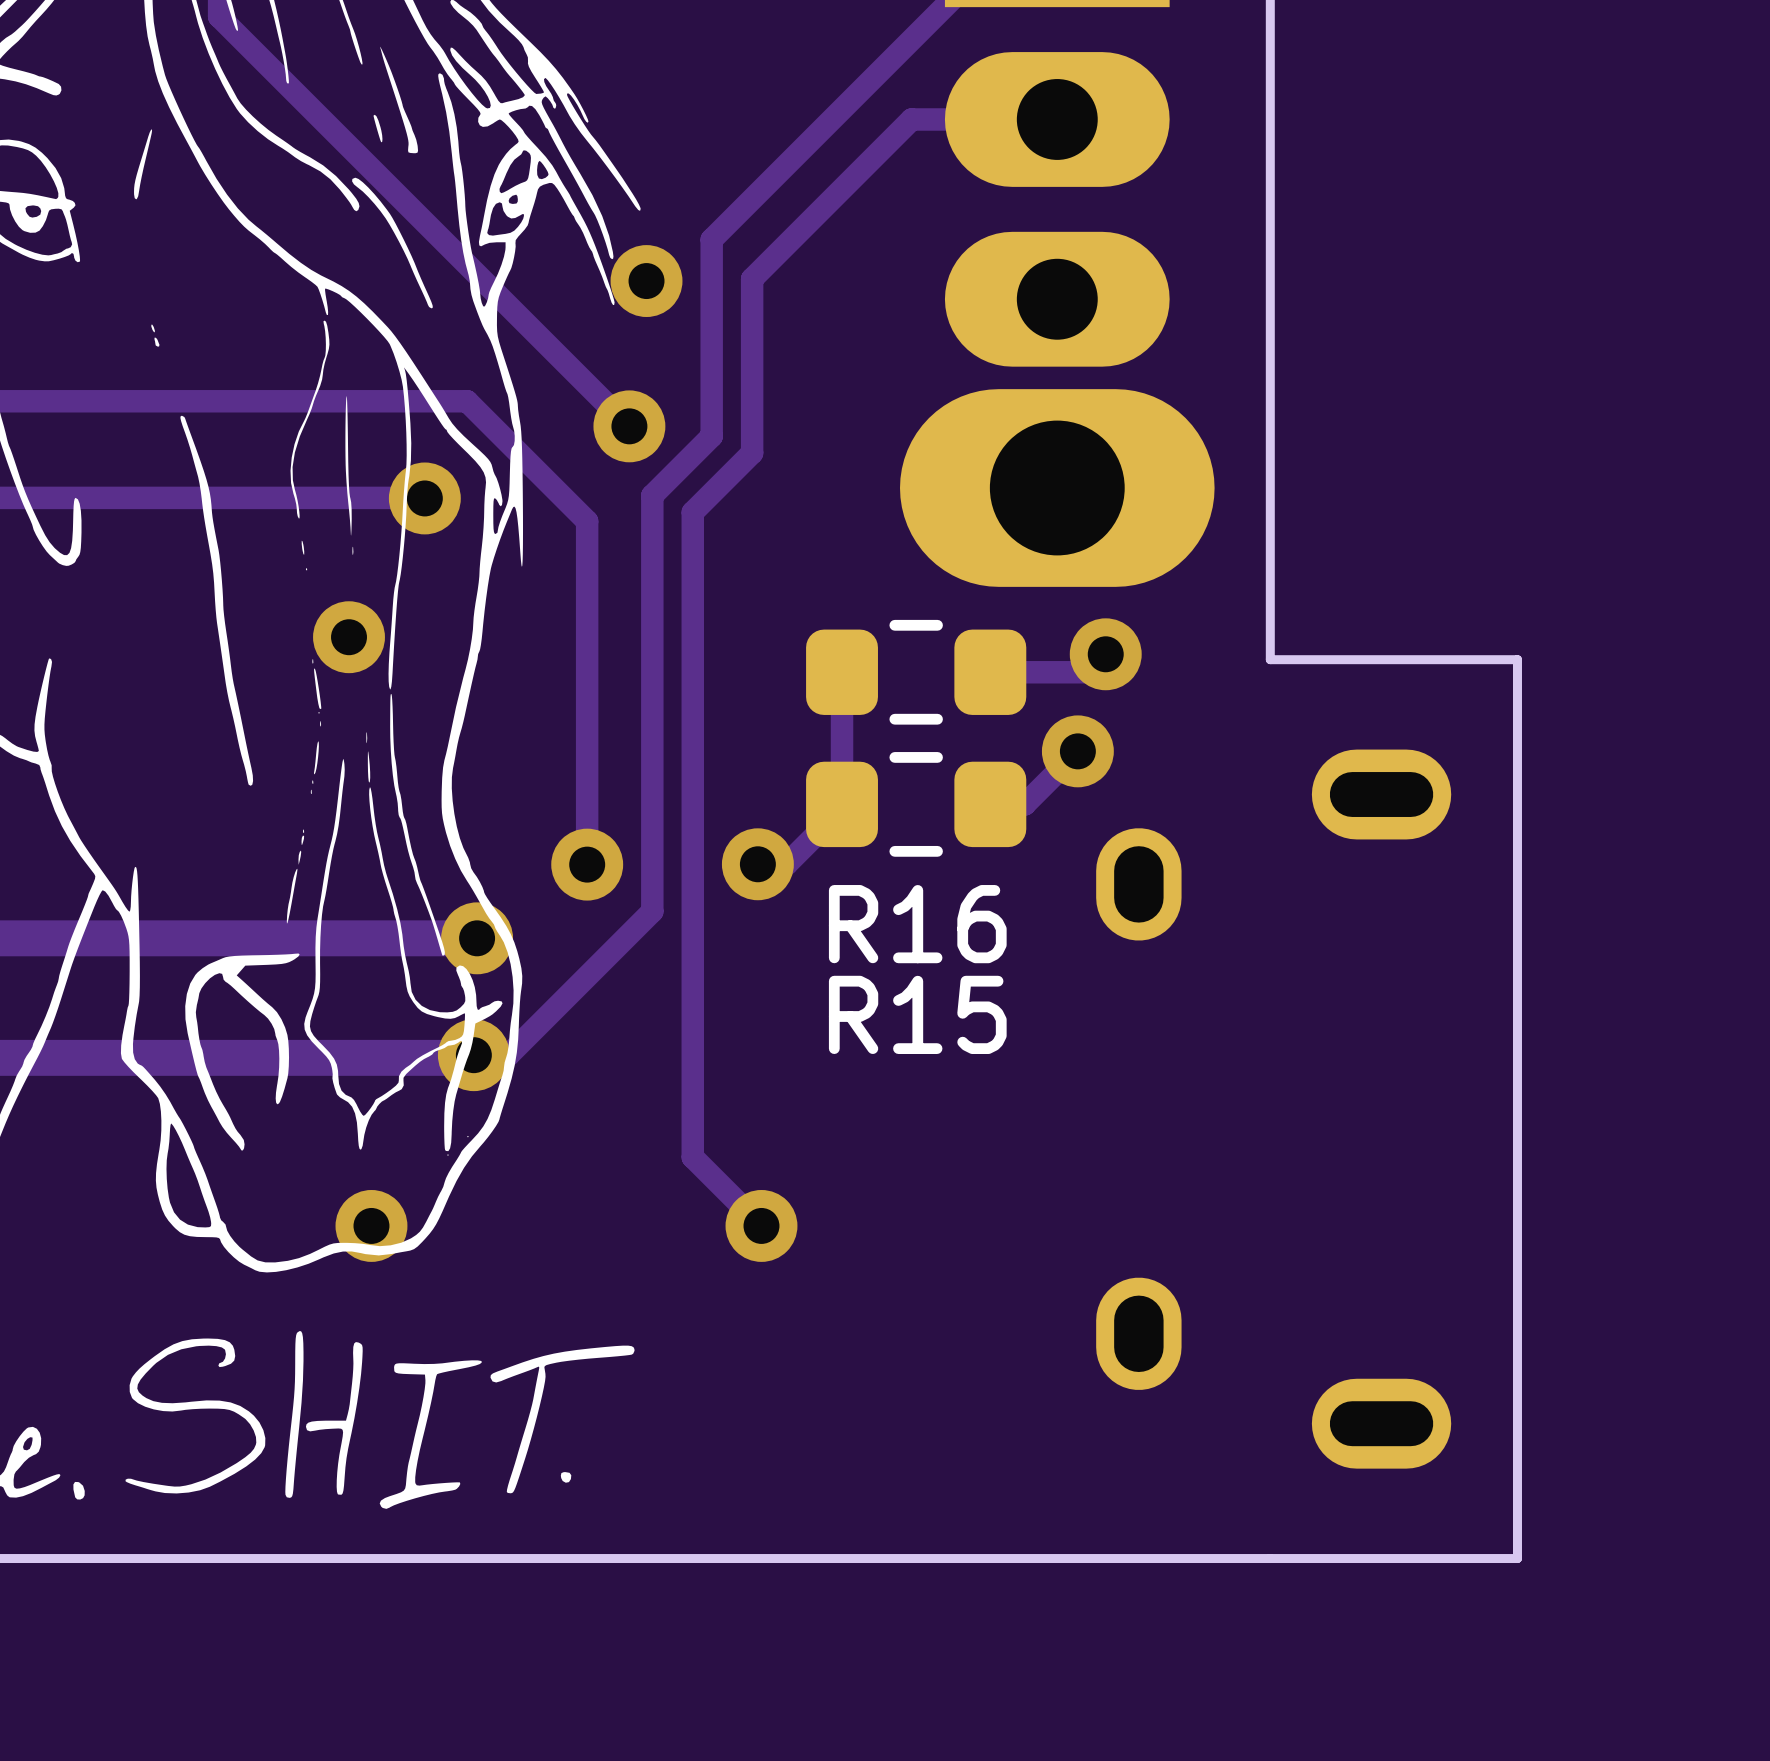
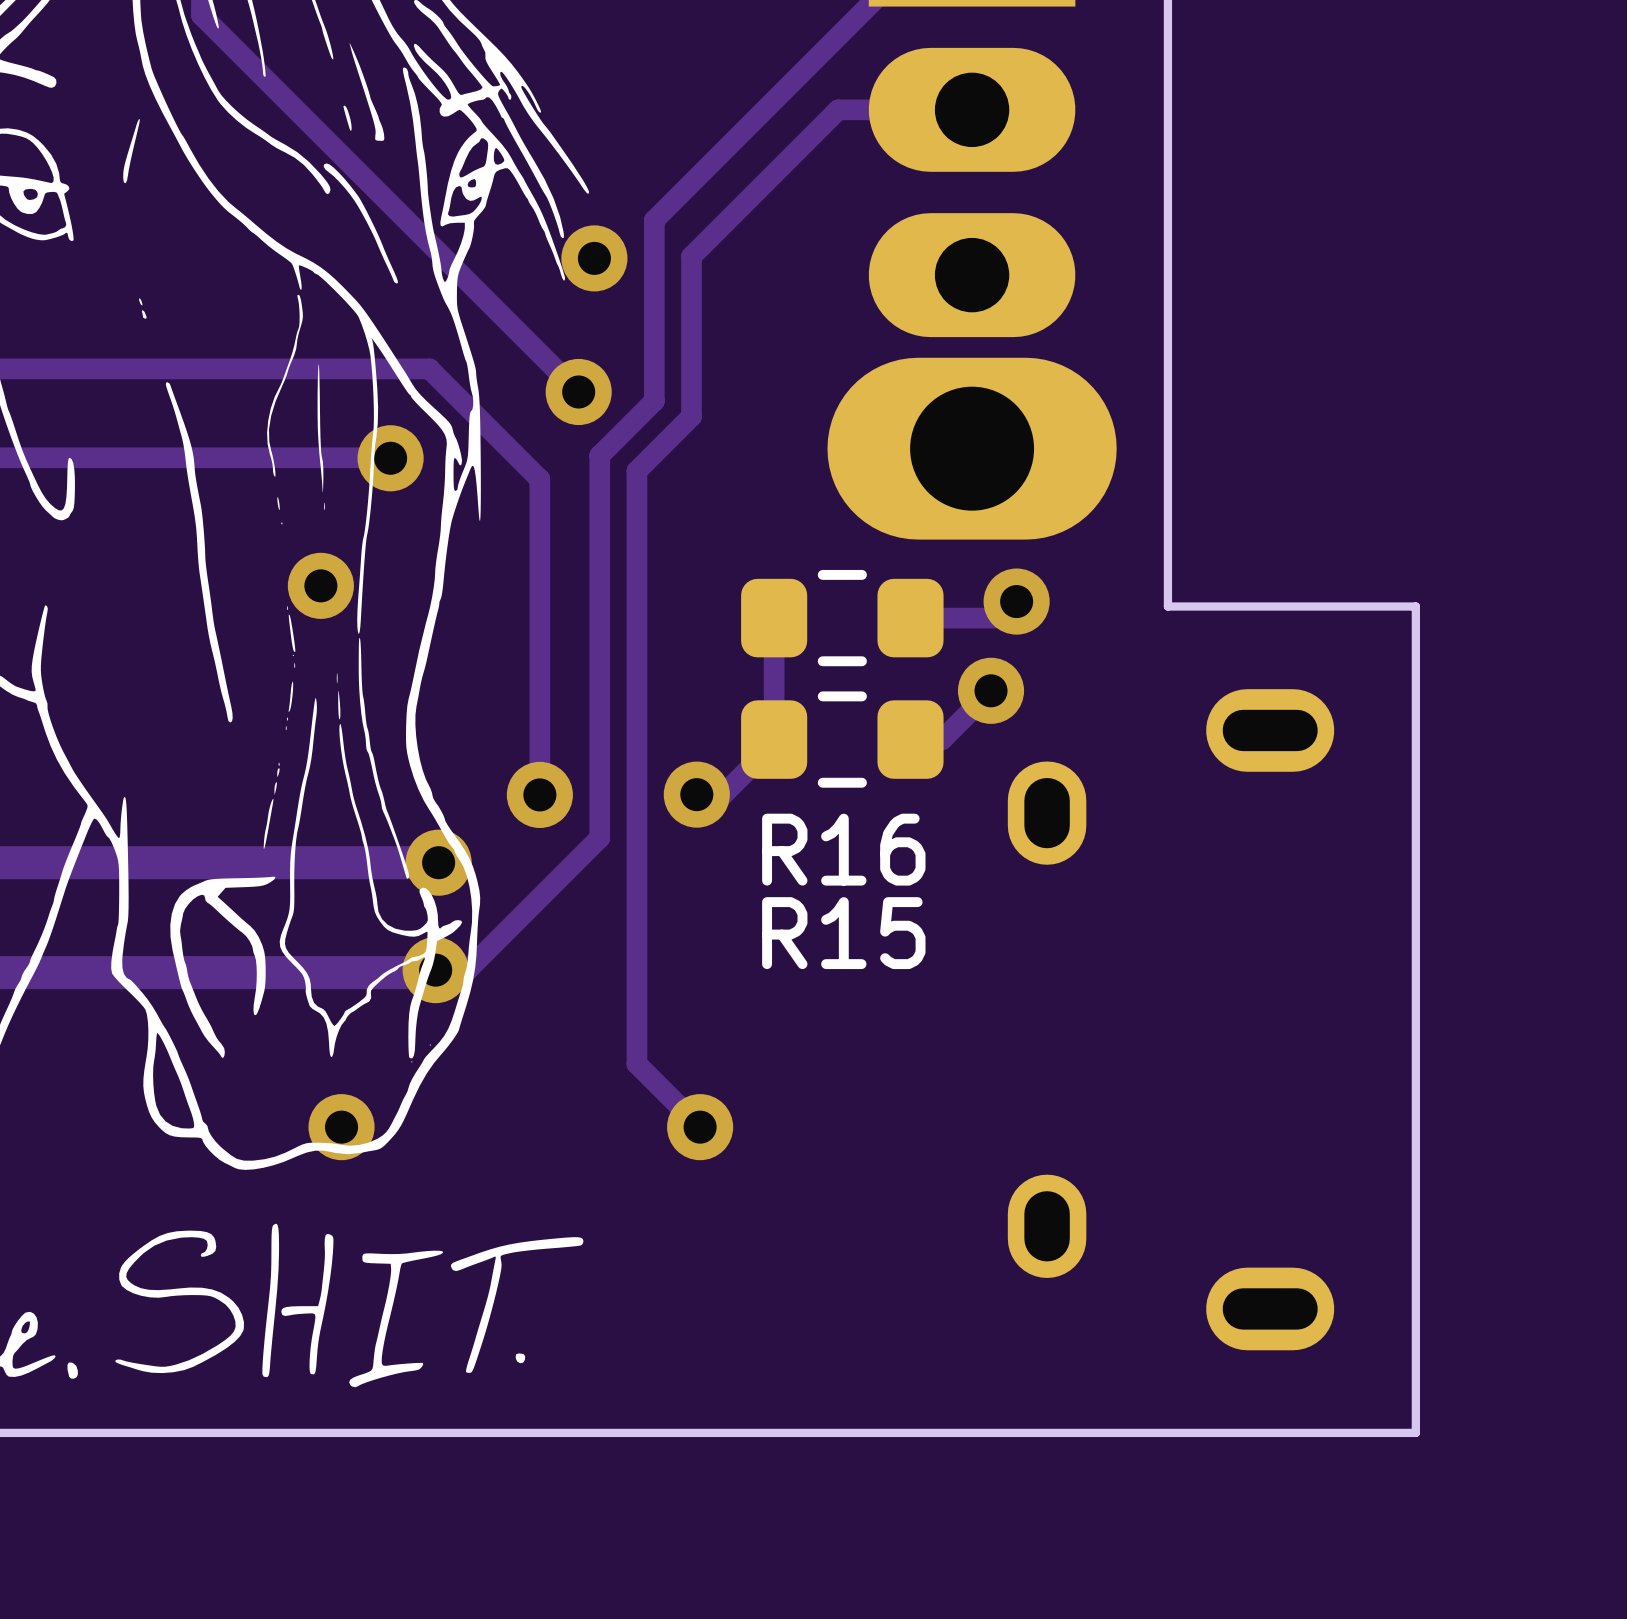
board edge: (1517, 659) (1517, 1558) -> (1395, 606) (1415, 606) (1415, 1432) (1395, 1432)

